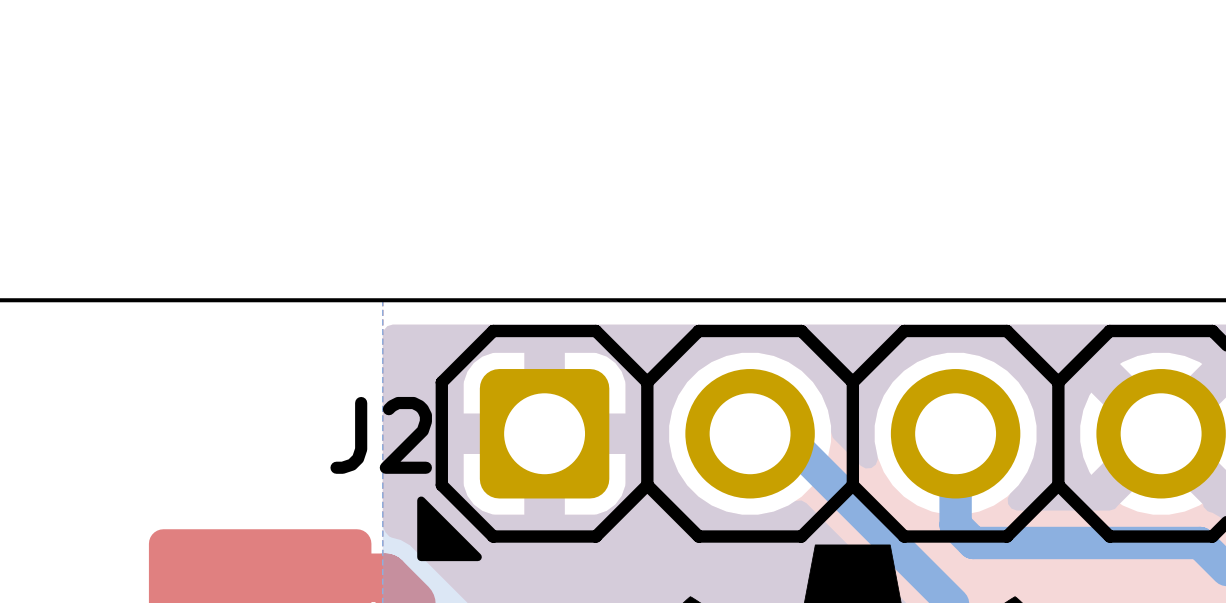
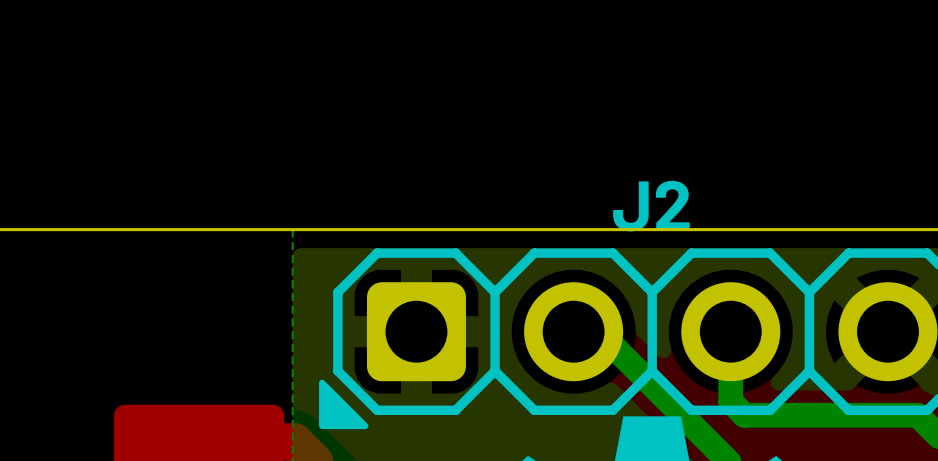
J2 name position: J2 (381, 435) -> J2 (651, 206)

